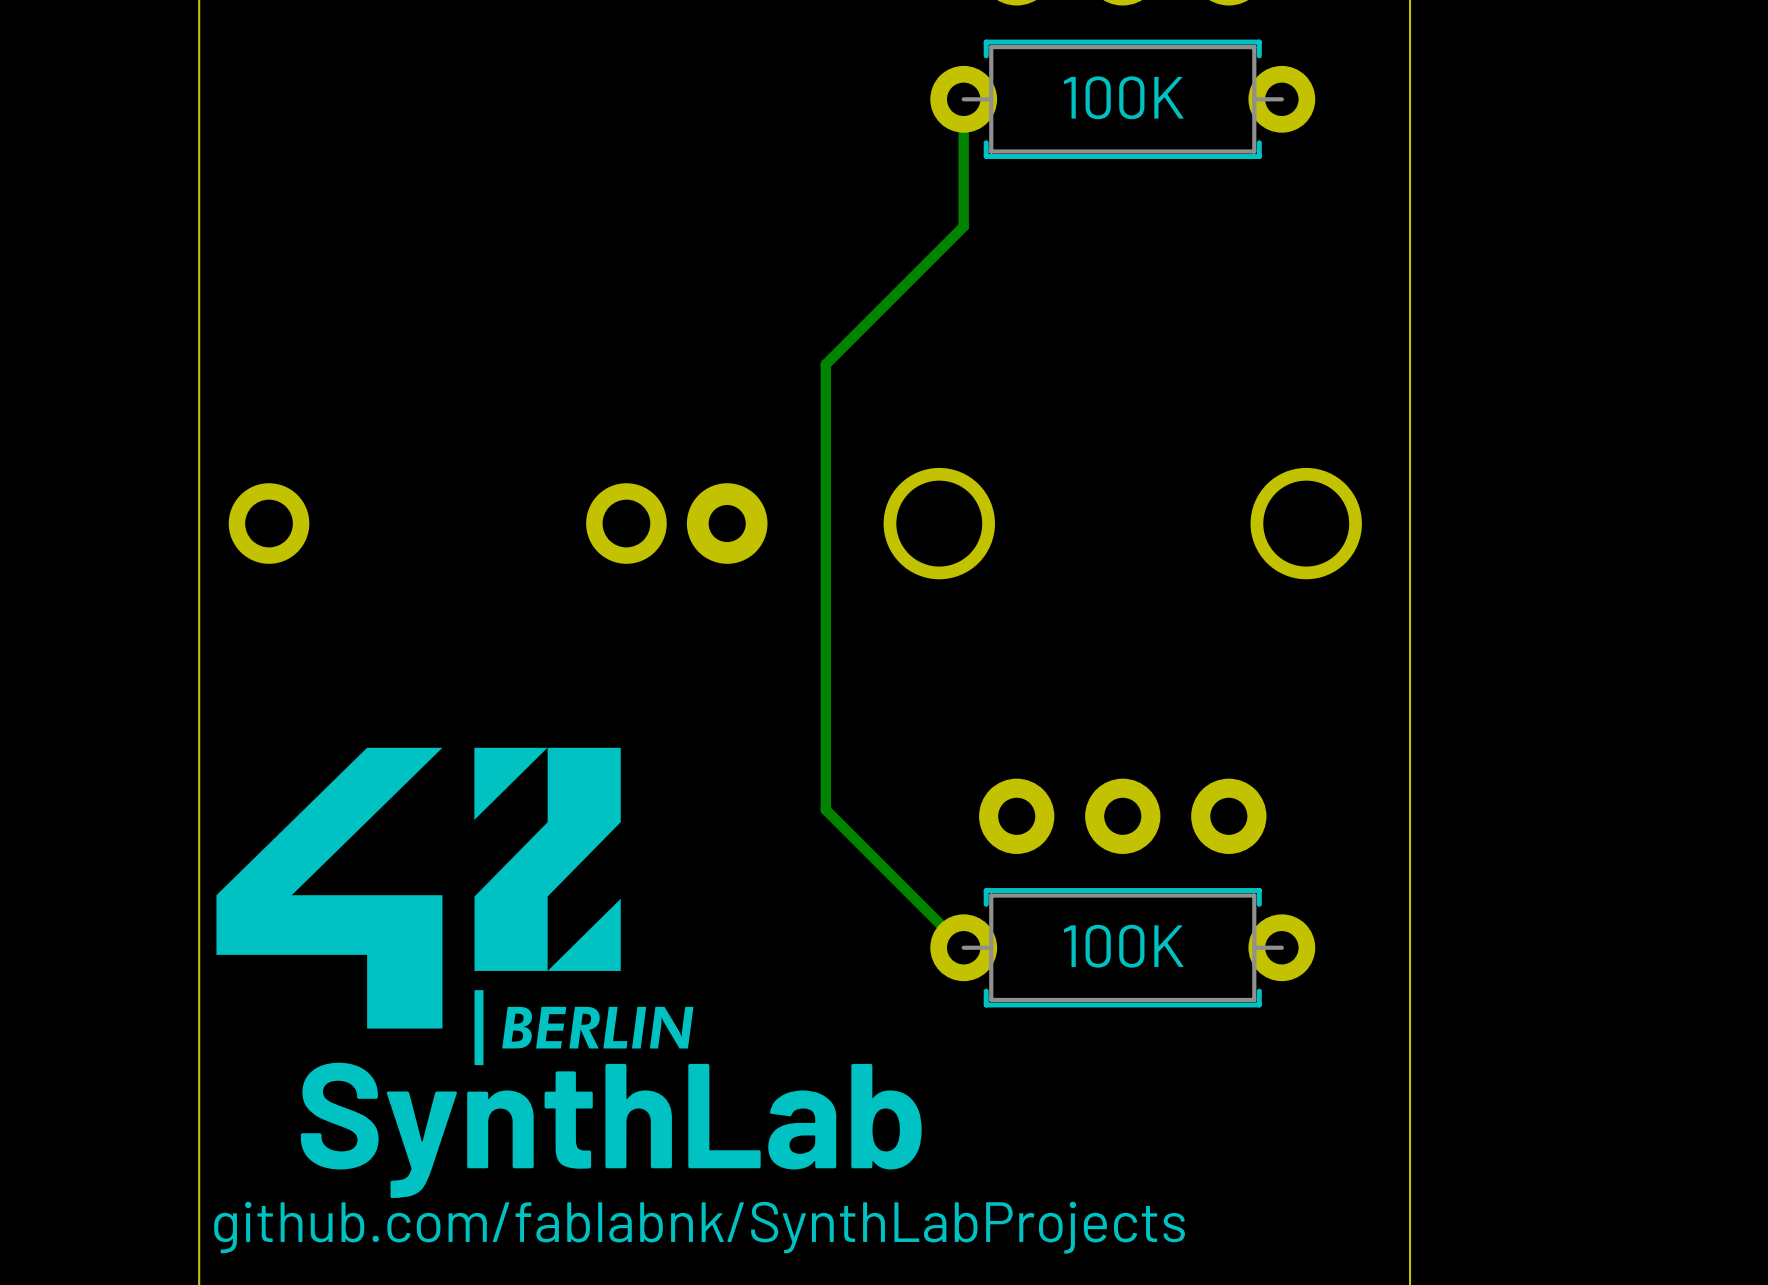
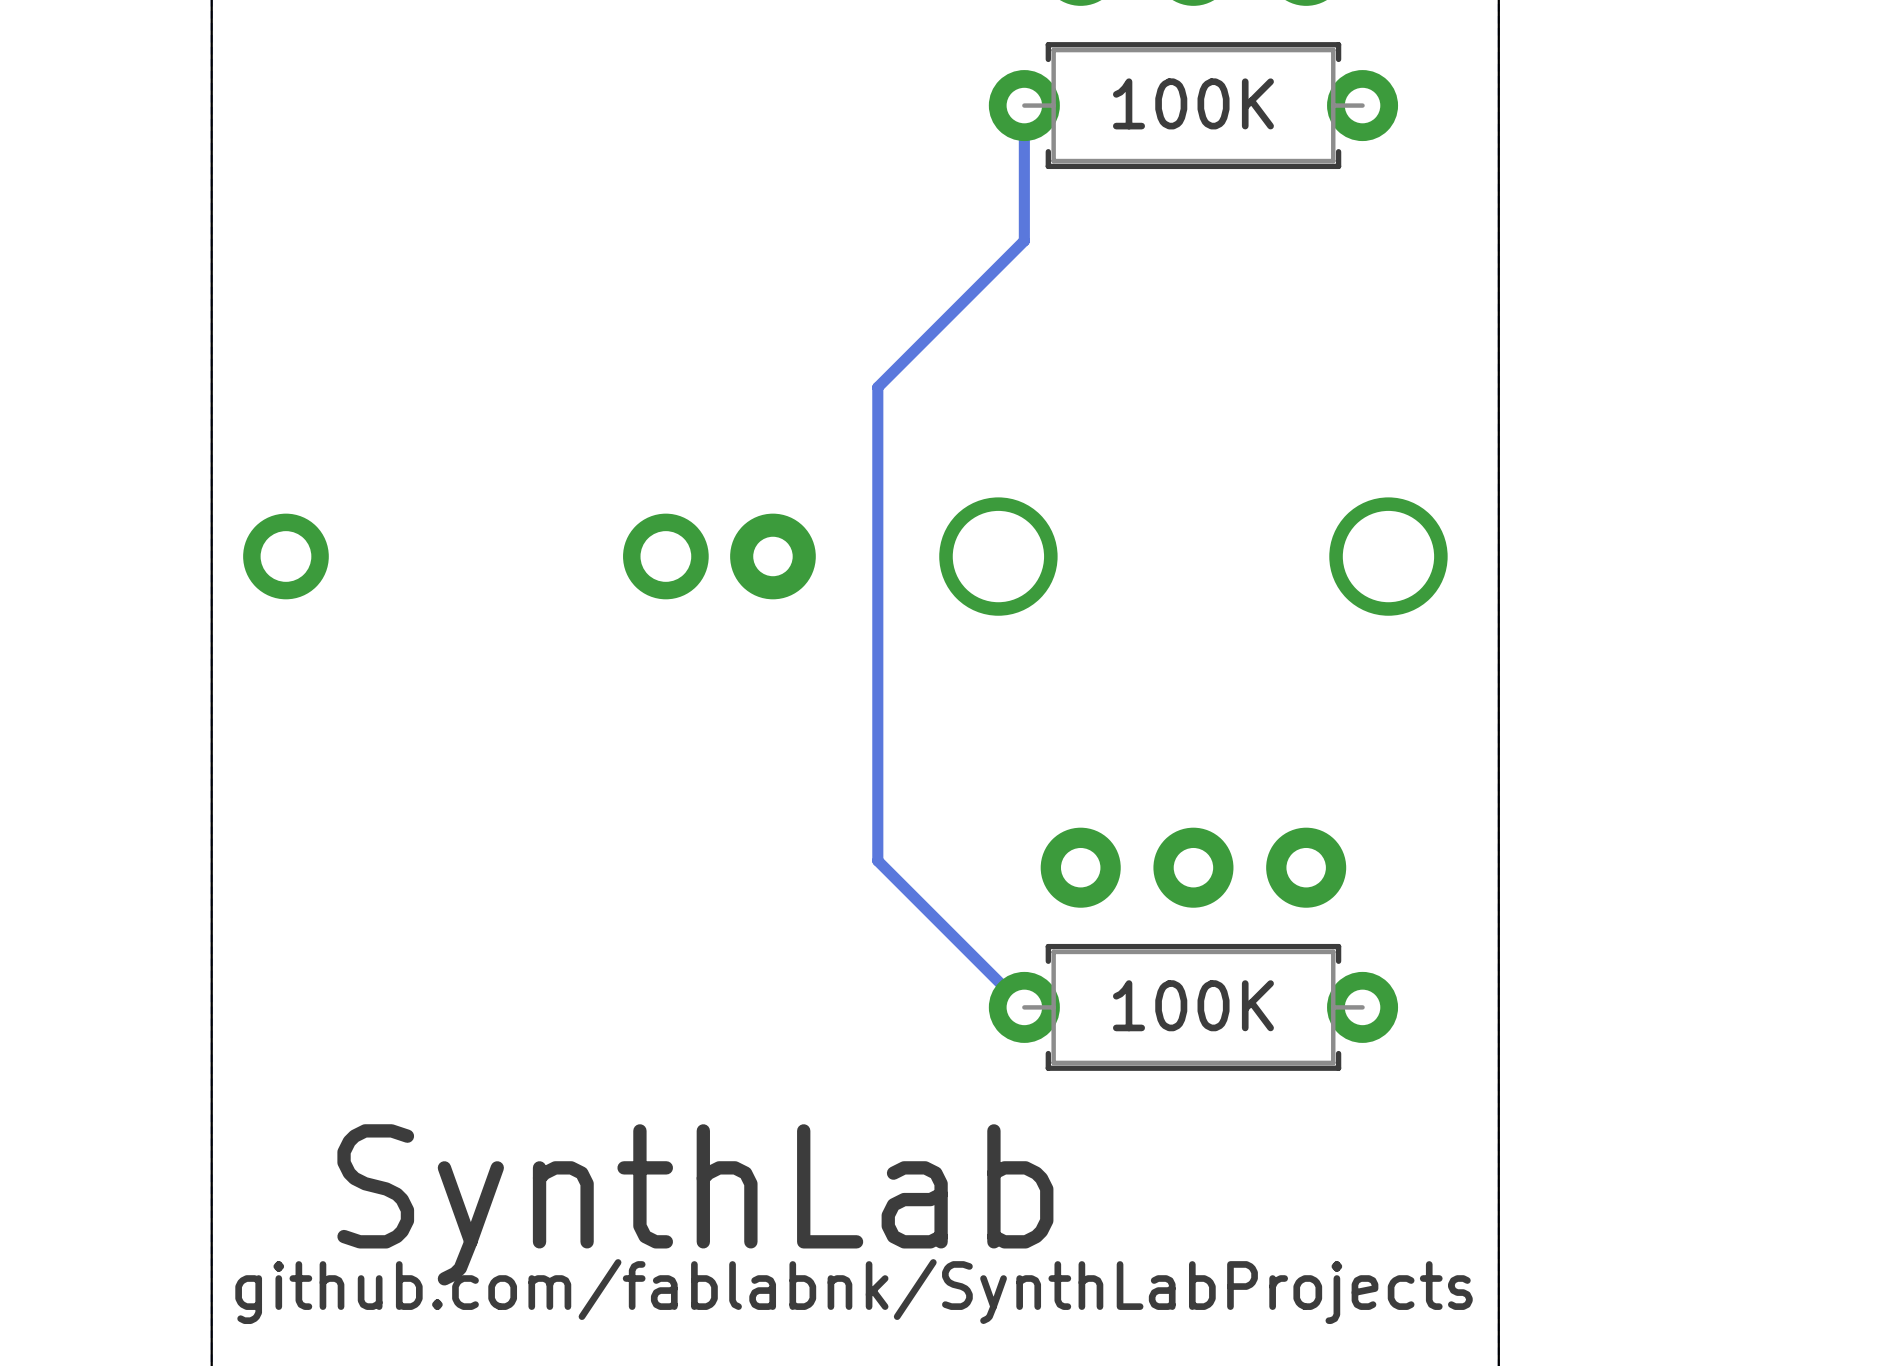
drawing: [216, 747, 694, 1066] -> none
text position: github.com/fablabnk/SynthLabProjects (699, 1227) -> github.com/fablabnk/SynthLabProjects (854, 1291)

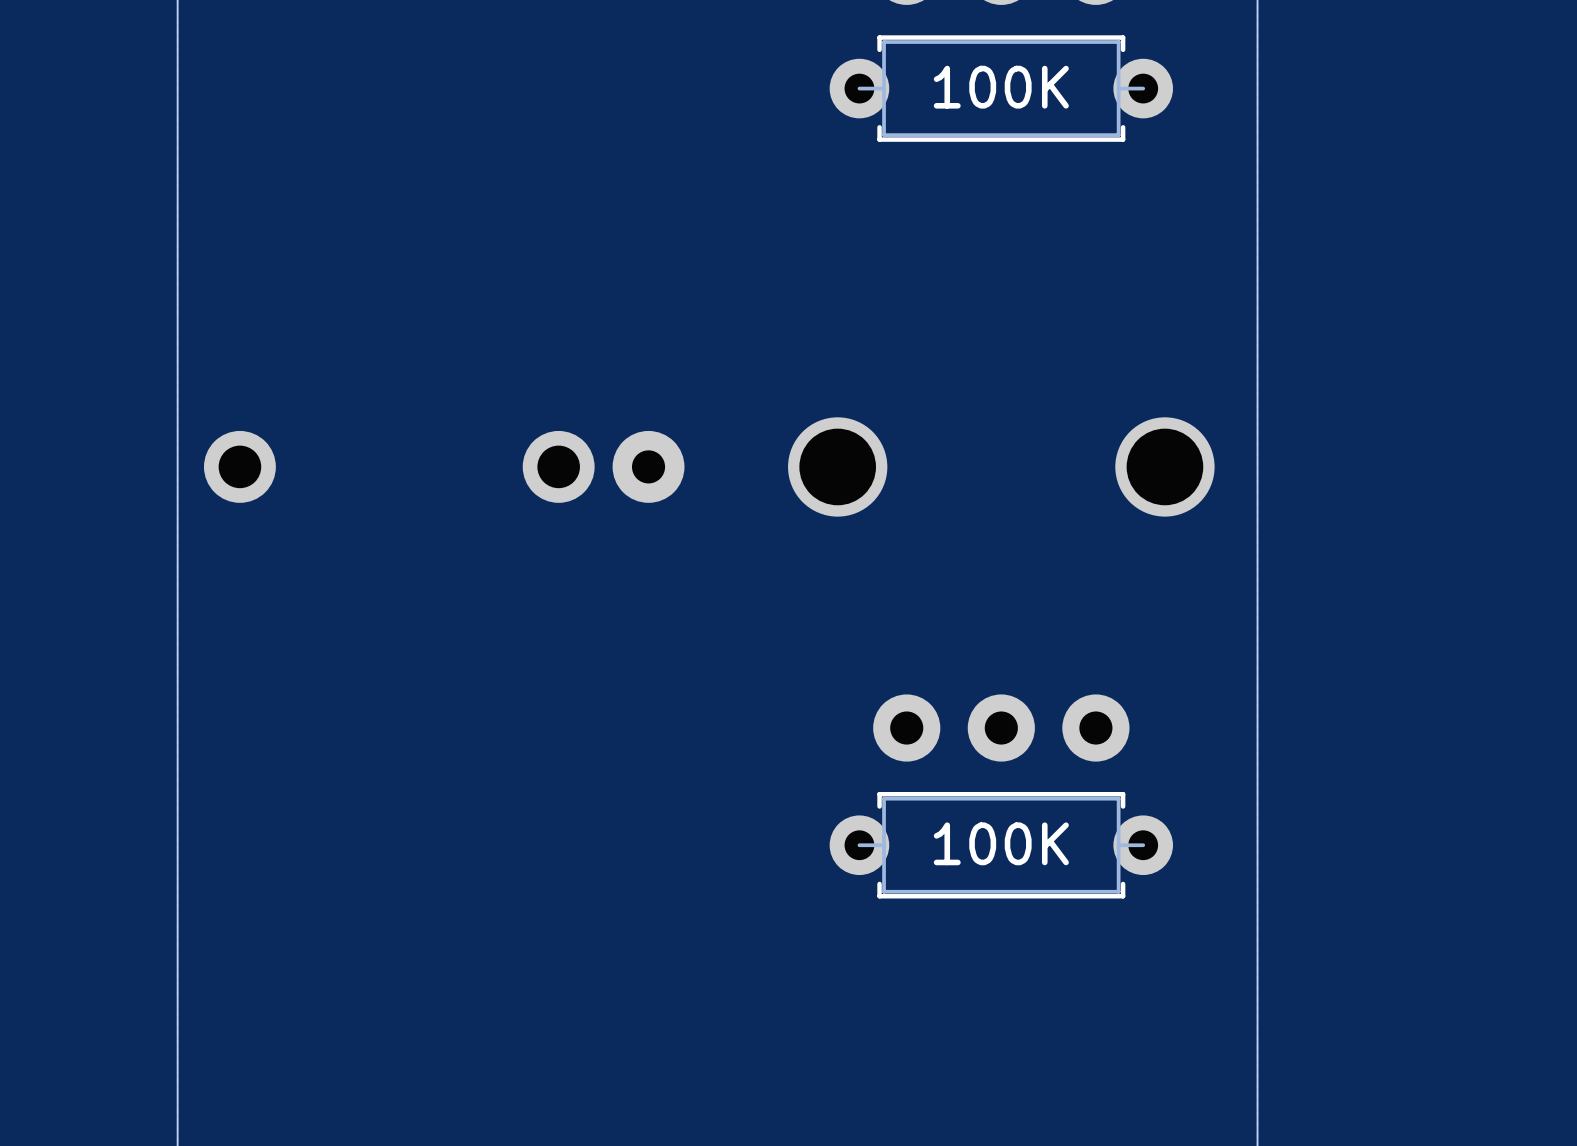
track: (1024, 105) (1024, 240) (877, 387) (877, 860) (1024, 1007) -> none
text: SynthLab (695, 1204) -> none
text: github.com/fablabnk/SynthLabProjects (854, 1291) -> none

